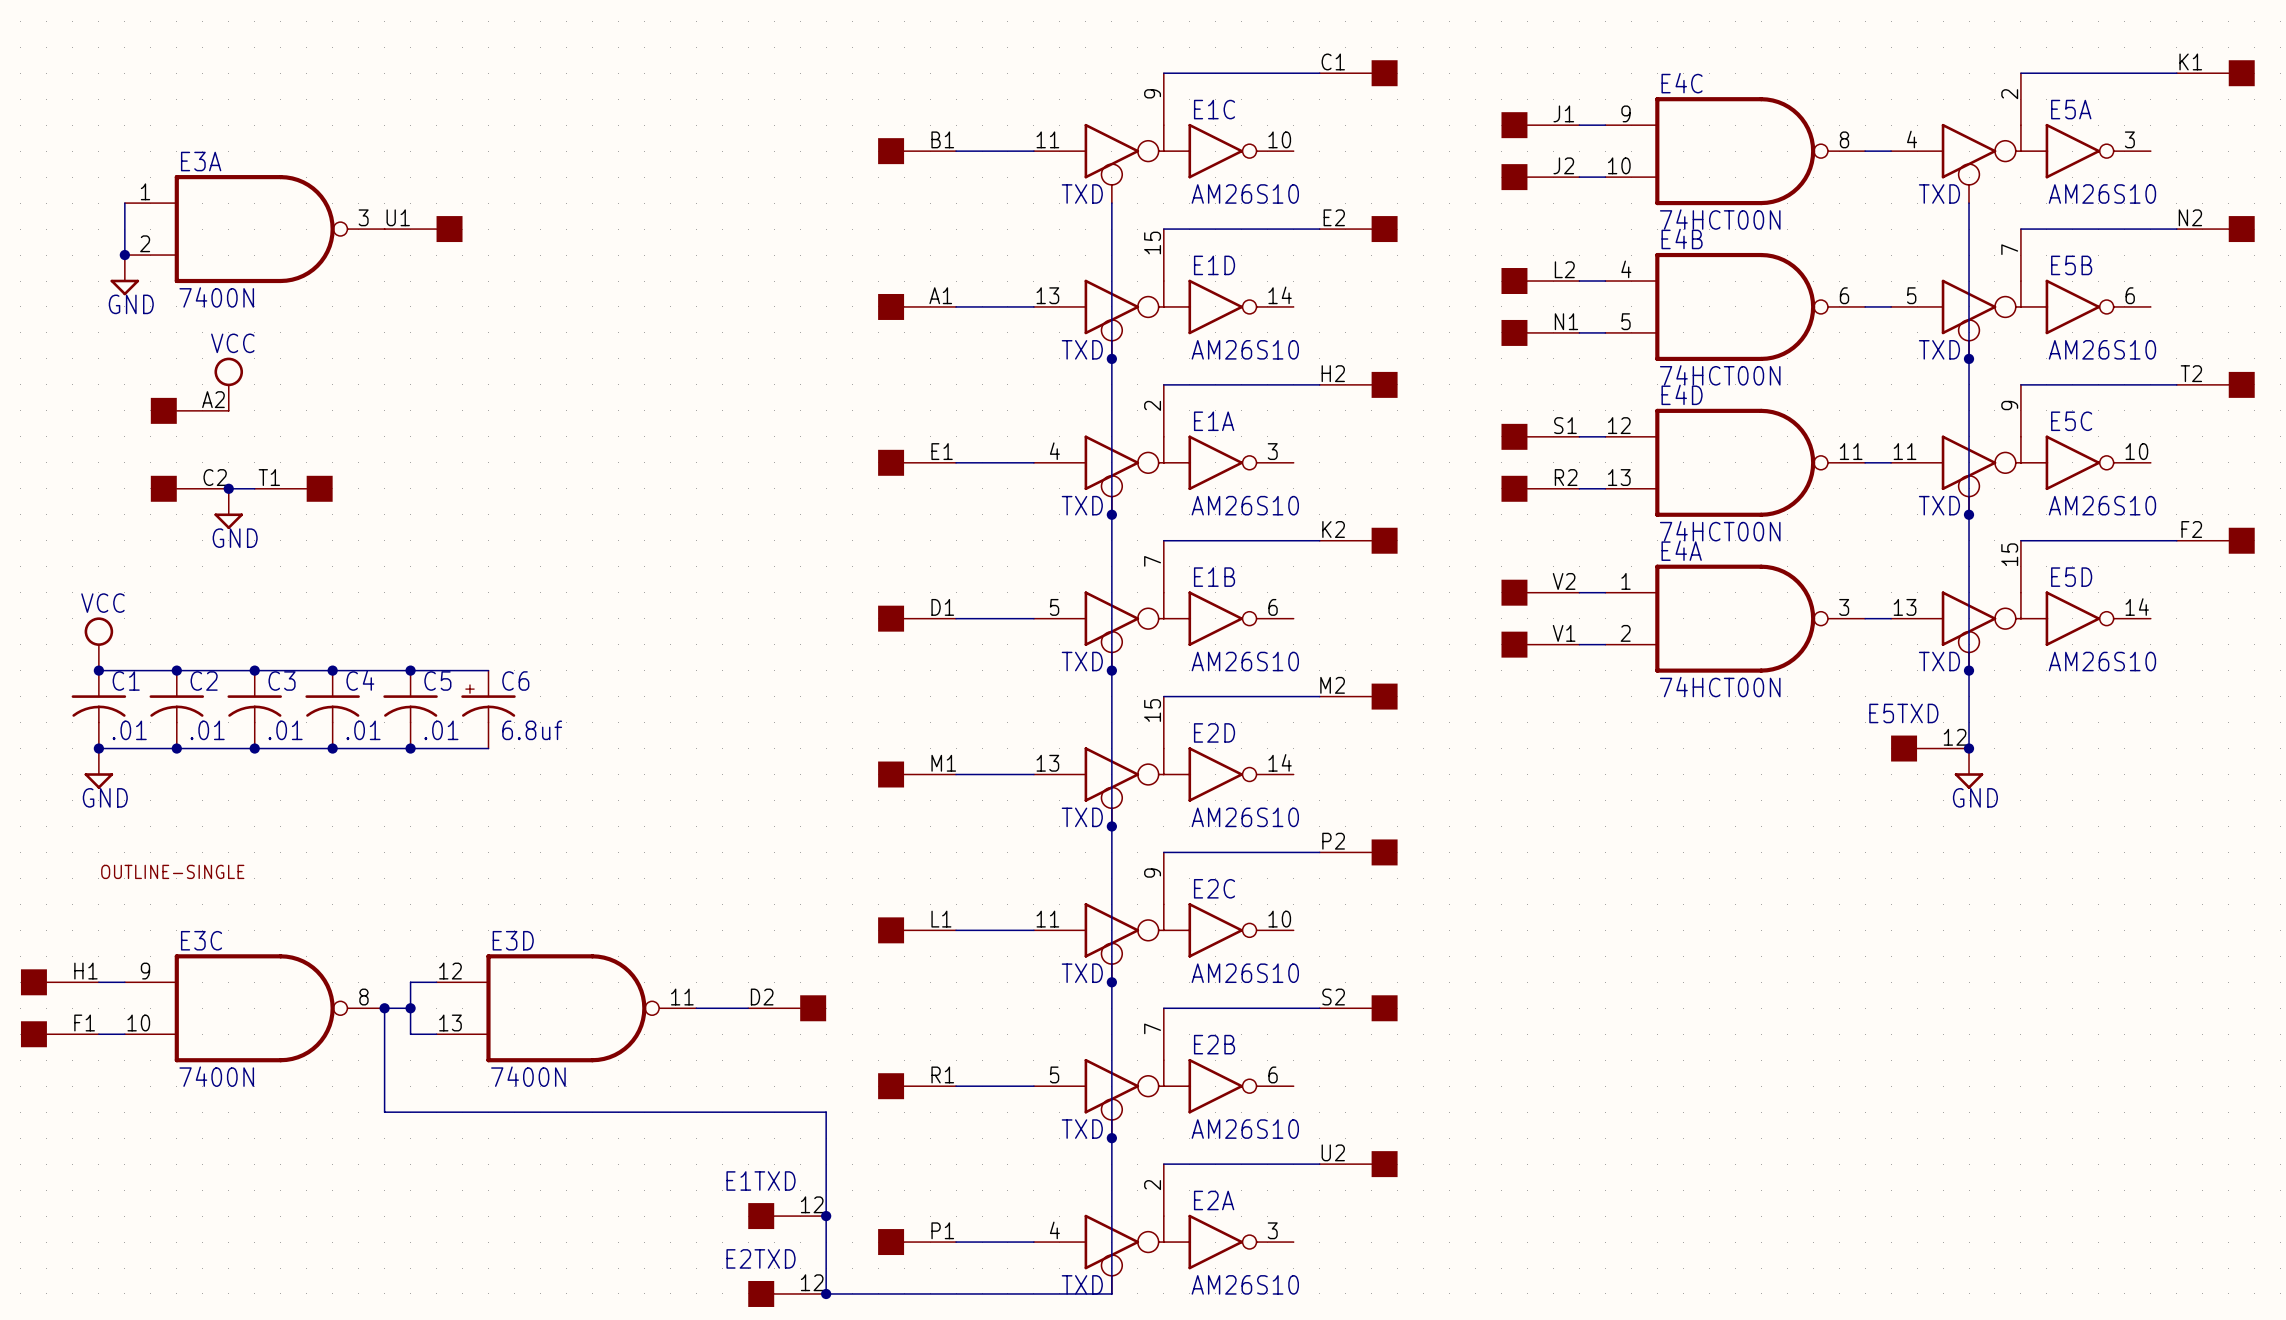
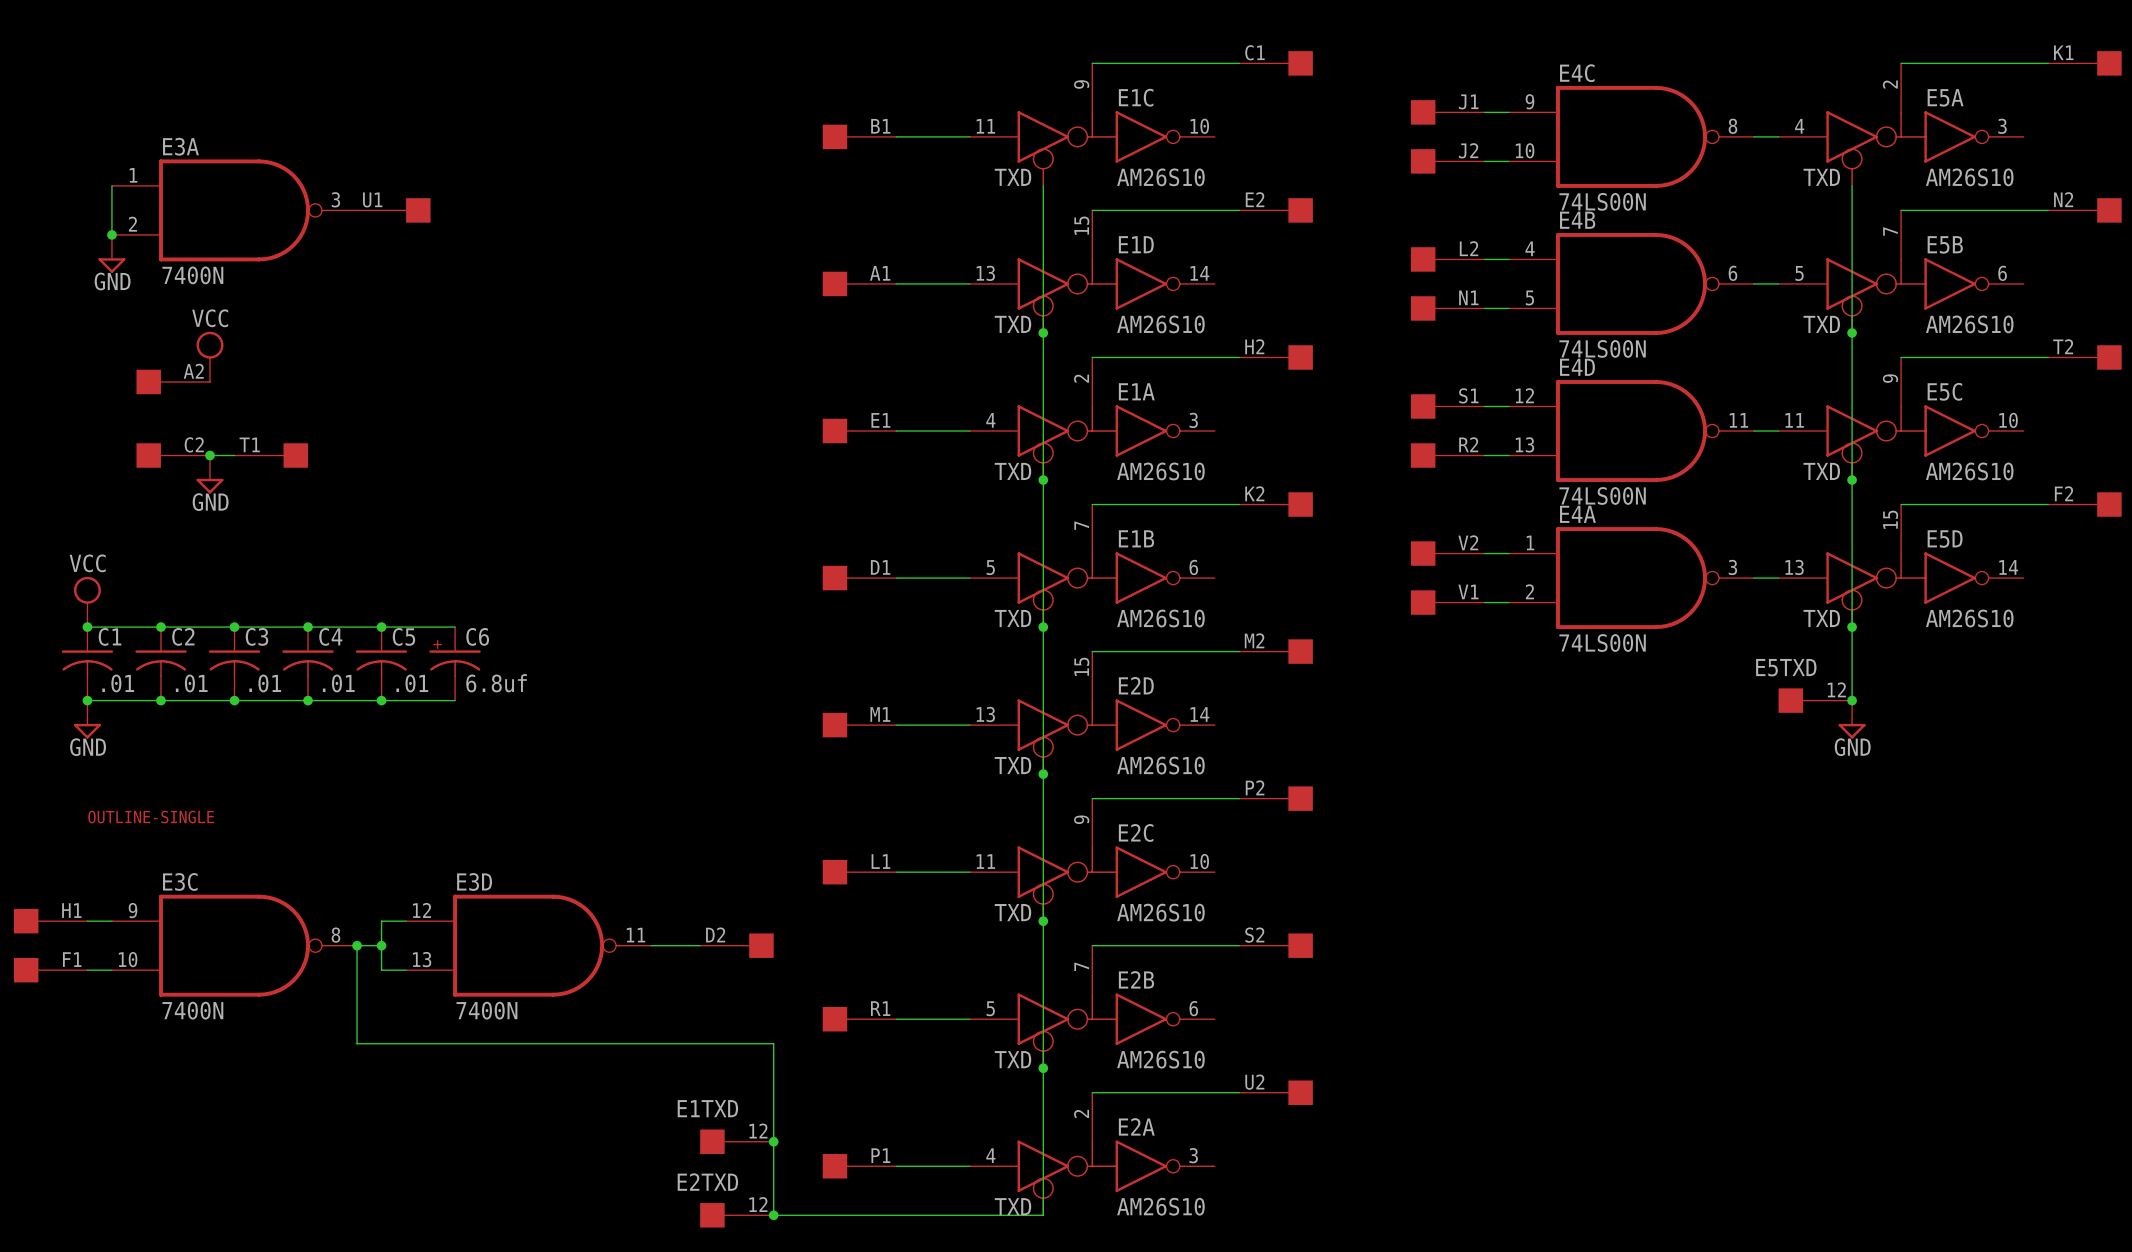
E4C value: 74HCT00N (1720, 219) -> 74LS00N (1602, 201)
E4B value: 74HCT00N (1720, 375) -> 74LS00N (1602, 348)
E4D value: 74HCT00N (1720, 531) -> 74LS00N (1602, 495)
E4A value: 74HCT00N (1720, 687) -> 74LS00N (1602, 643)

